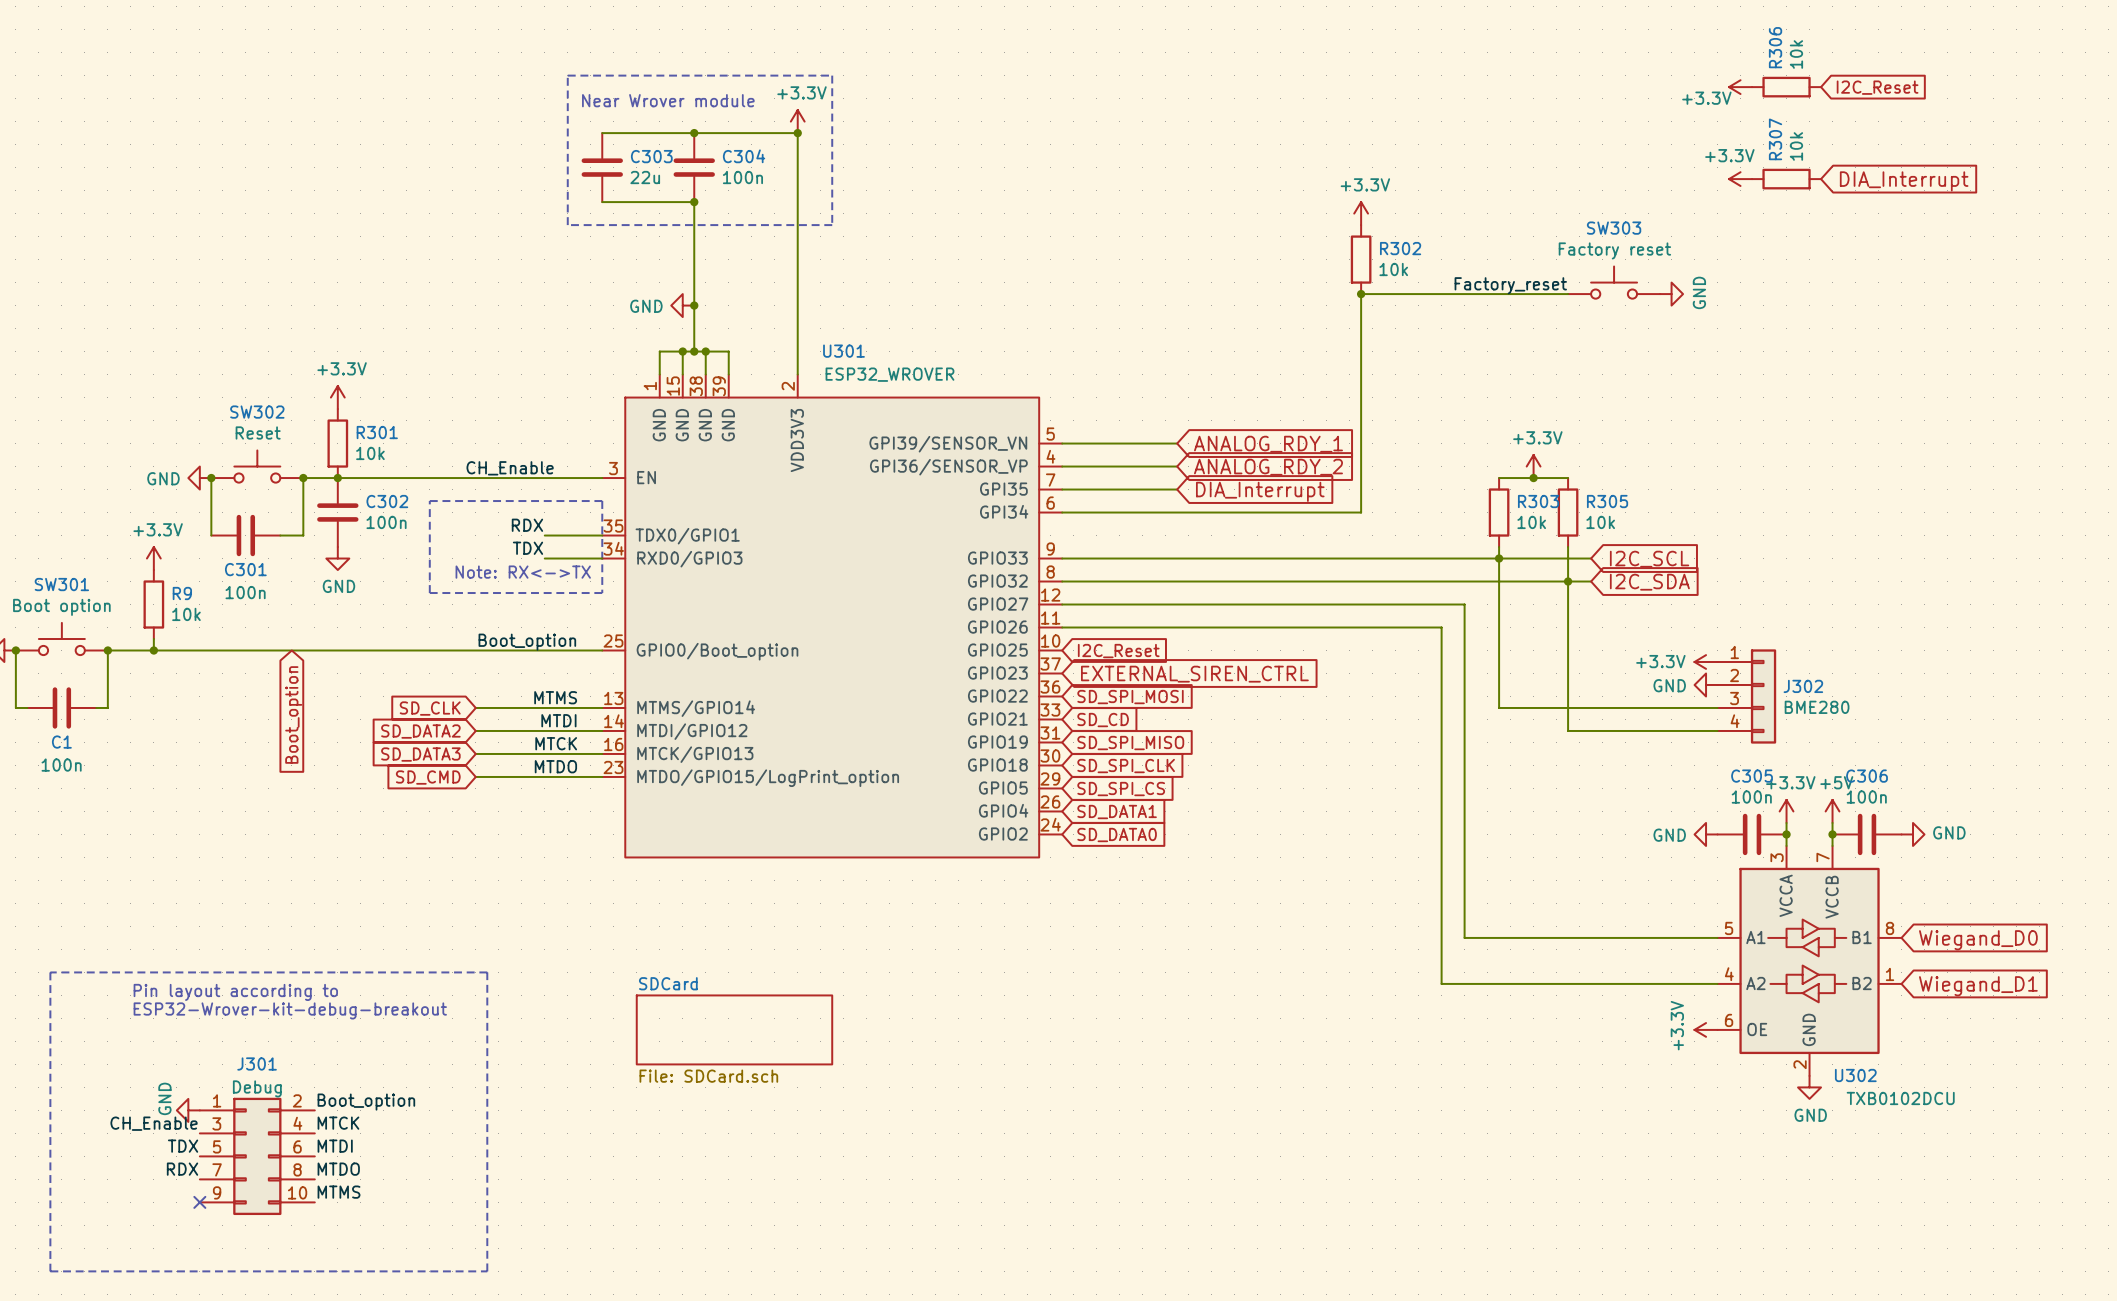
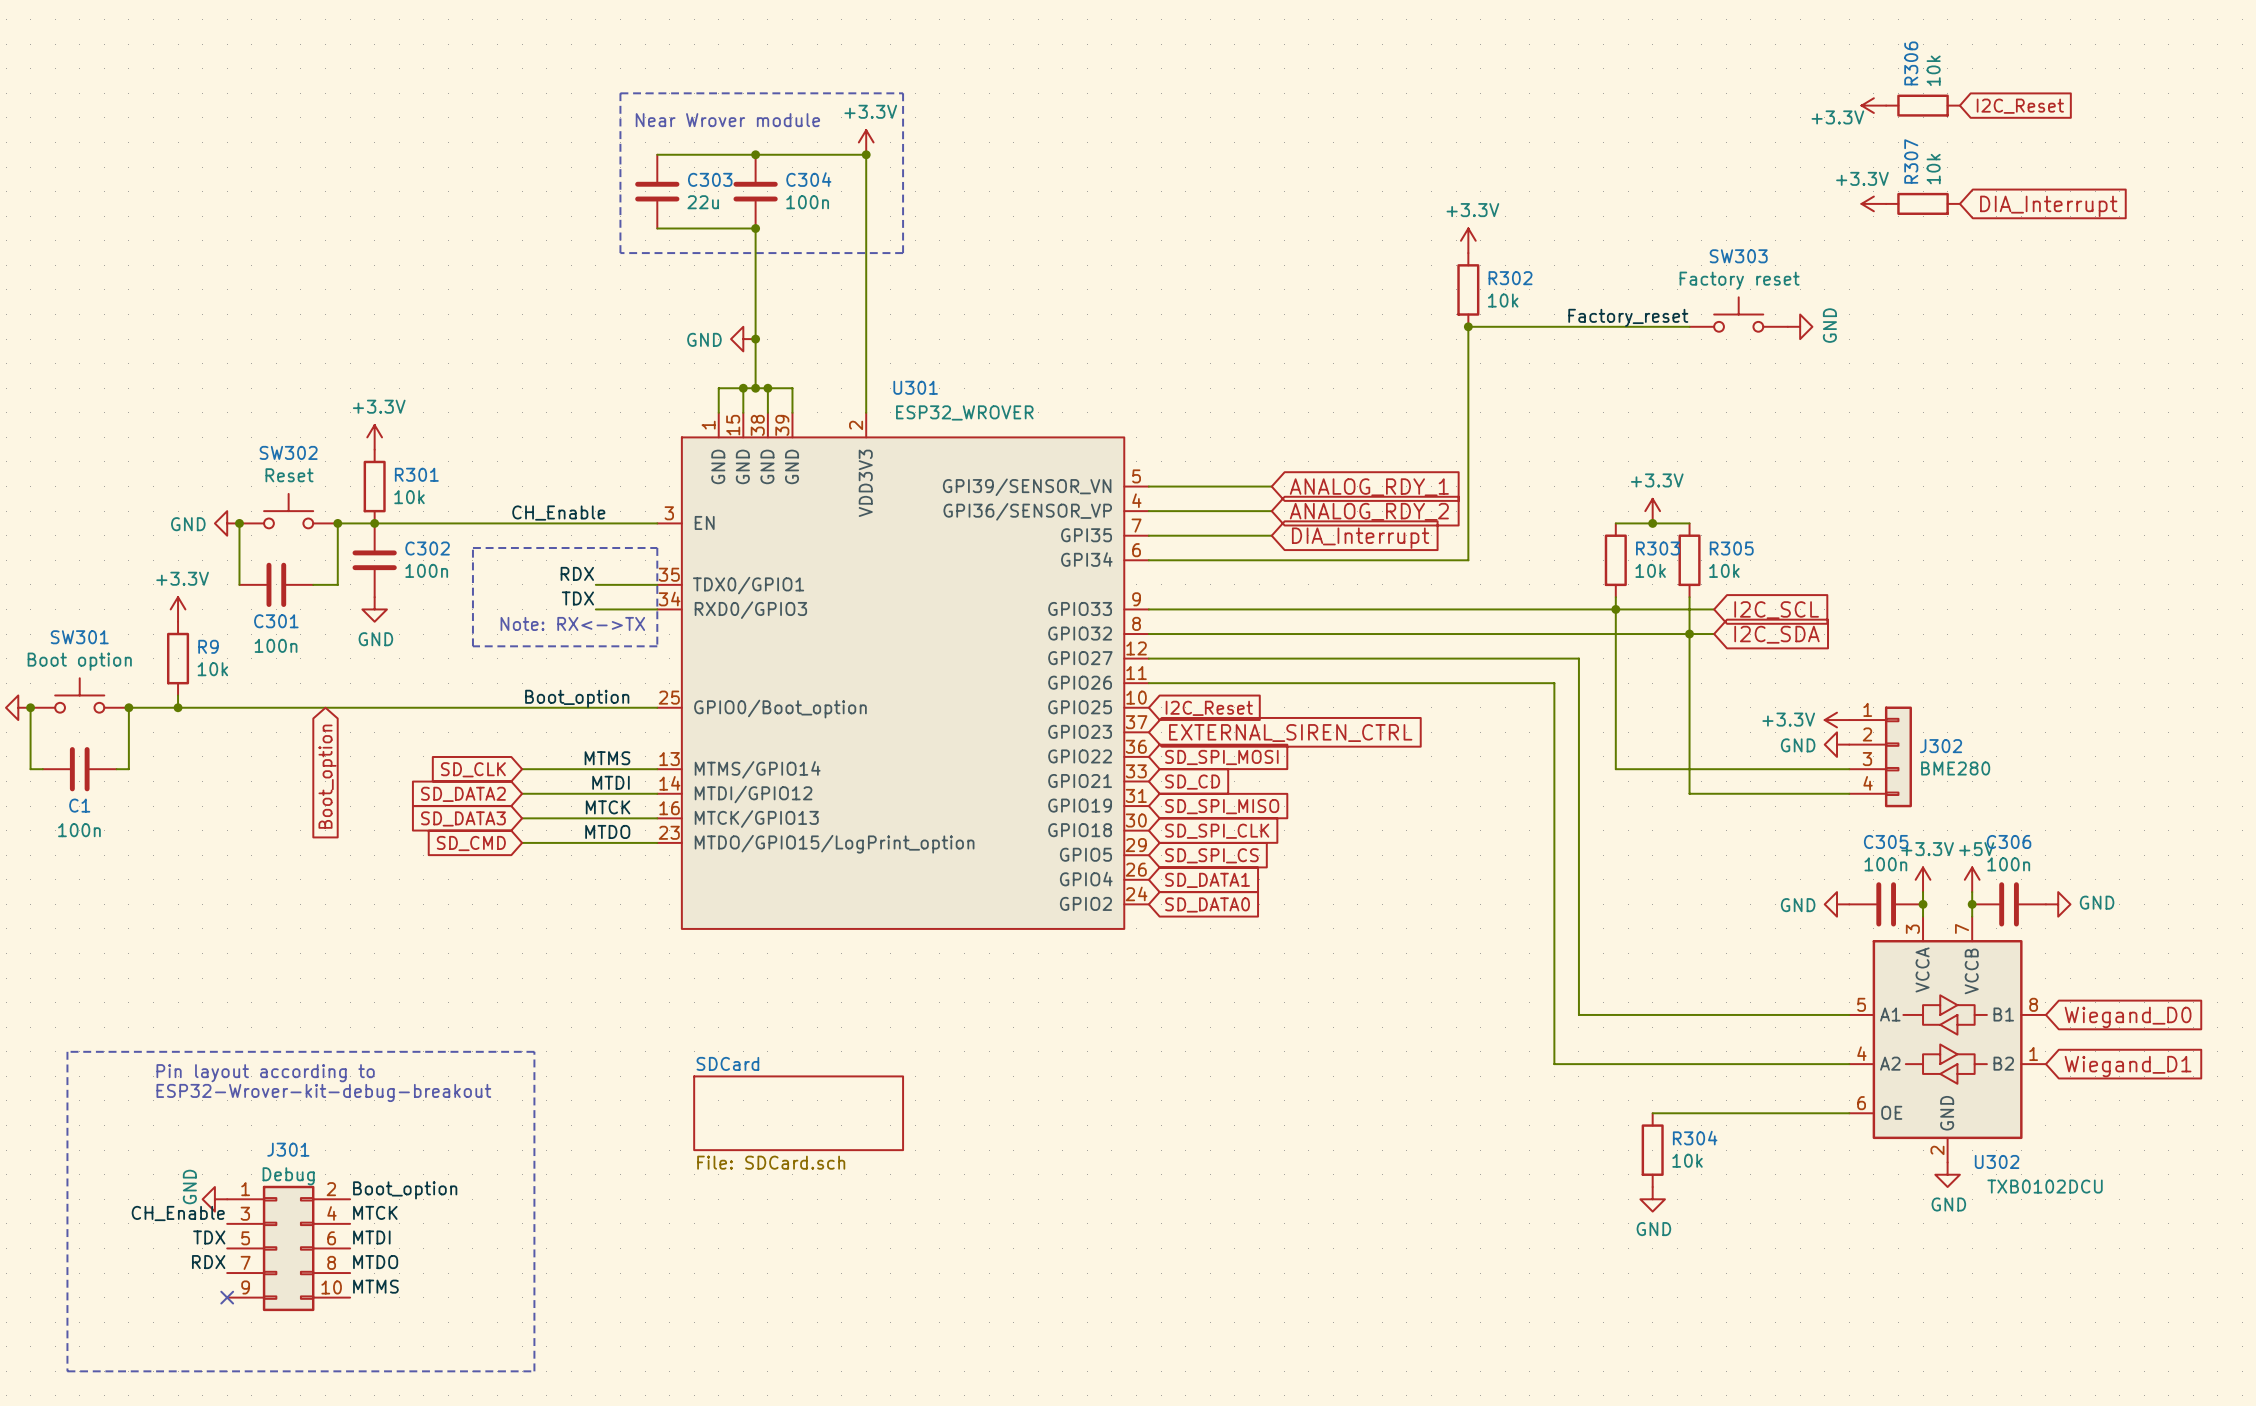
wire: none -> (1652, 1113) (1849, 1113)
power symbol: +3.3V (1706, 1029) -> none
R304: none -> 10k (1652, 1150)
power symbol: none -> GND (1652, 1199)

